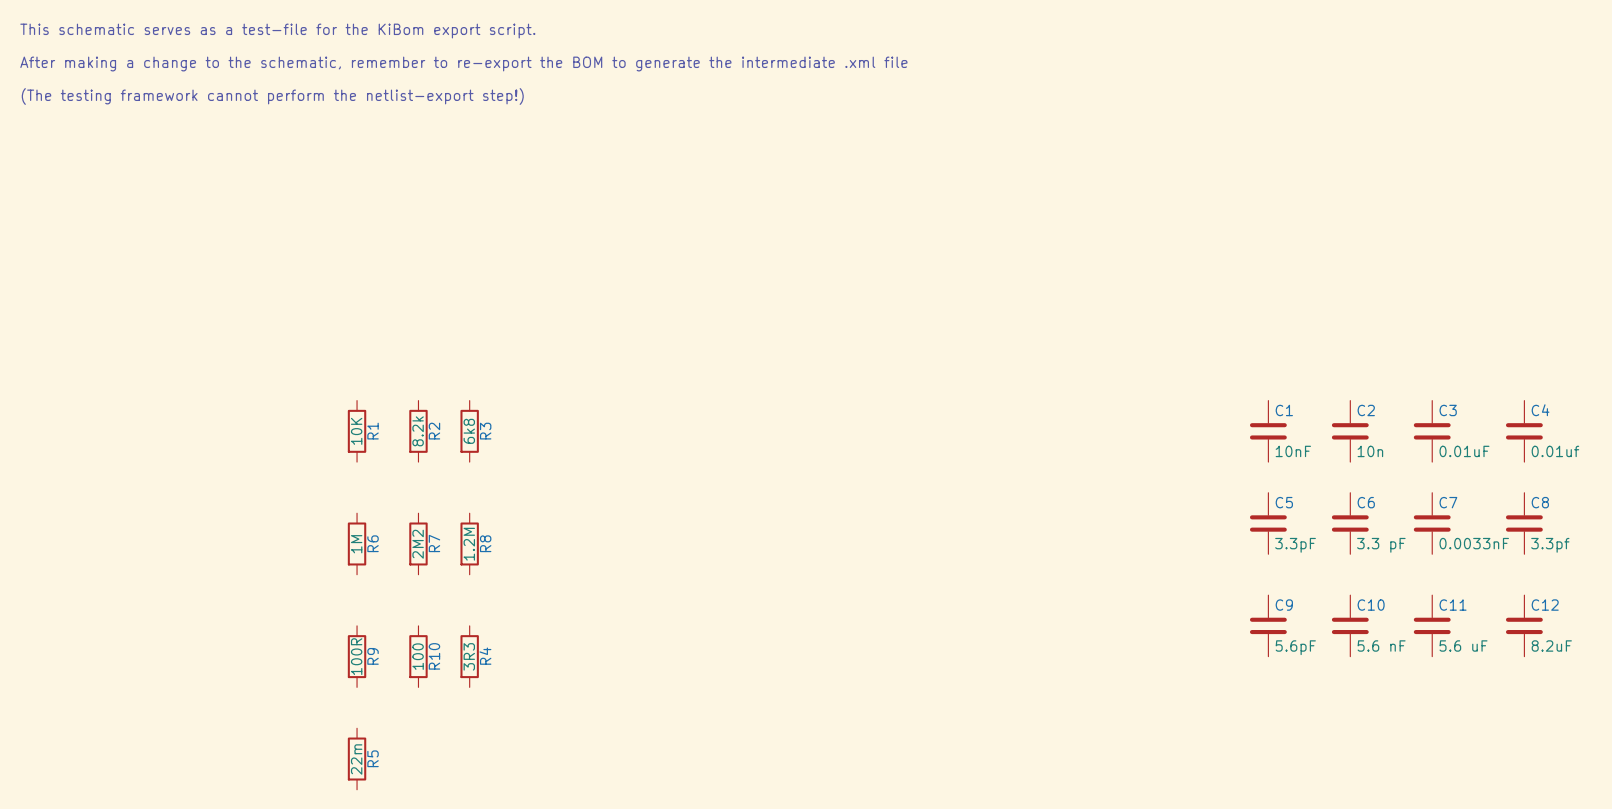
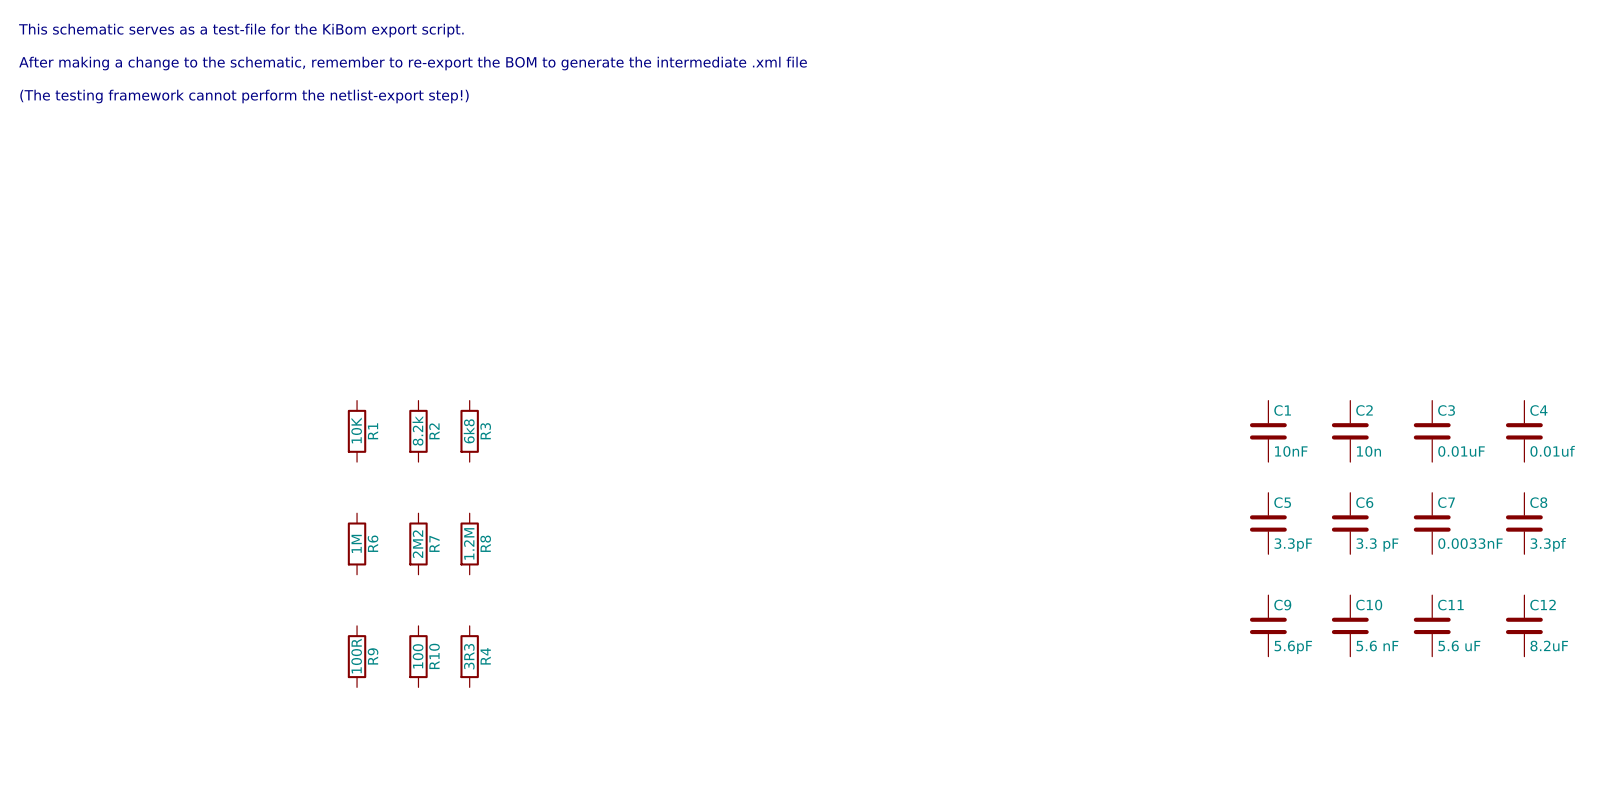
R5: 22m (357, 759) -> none

